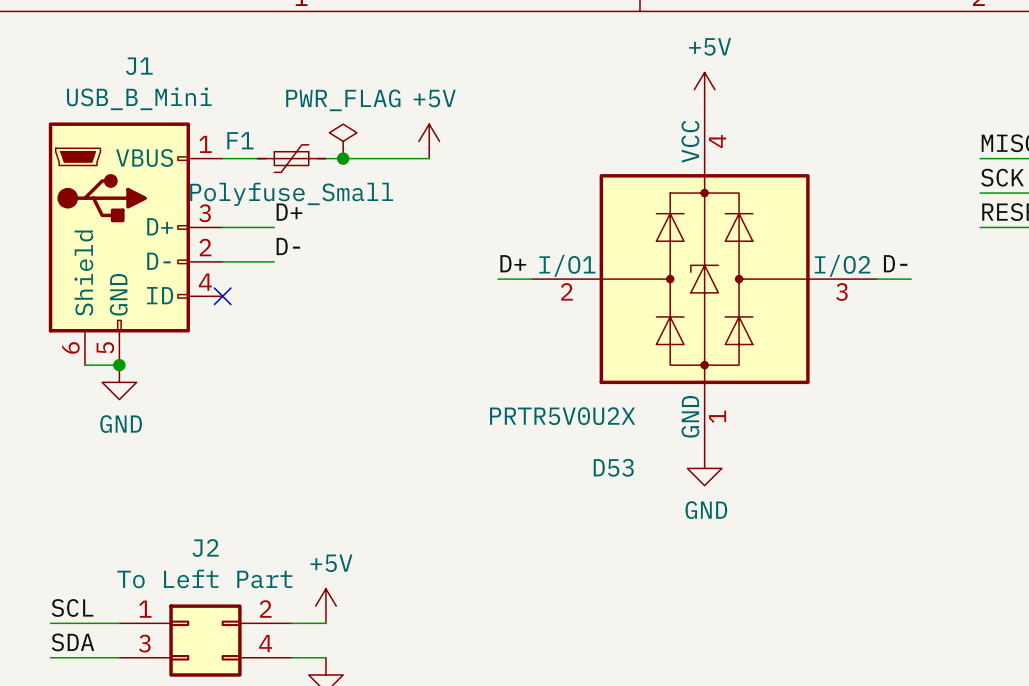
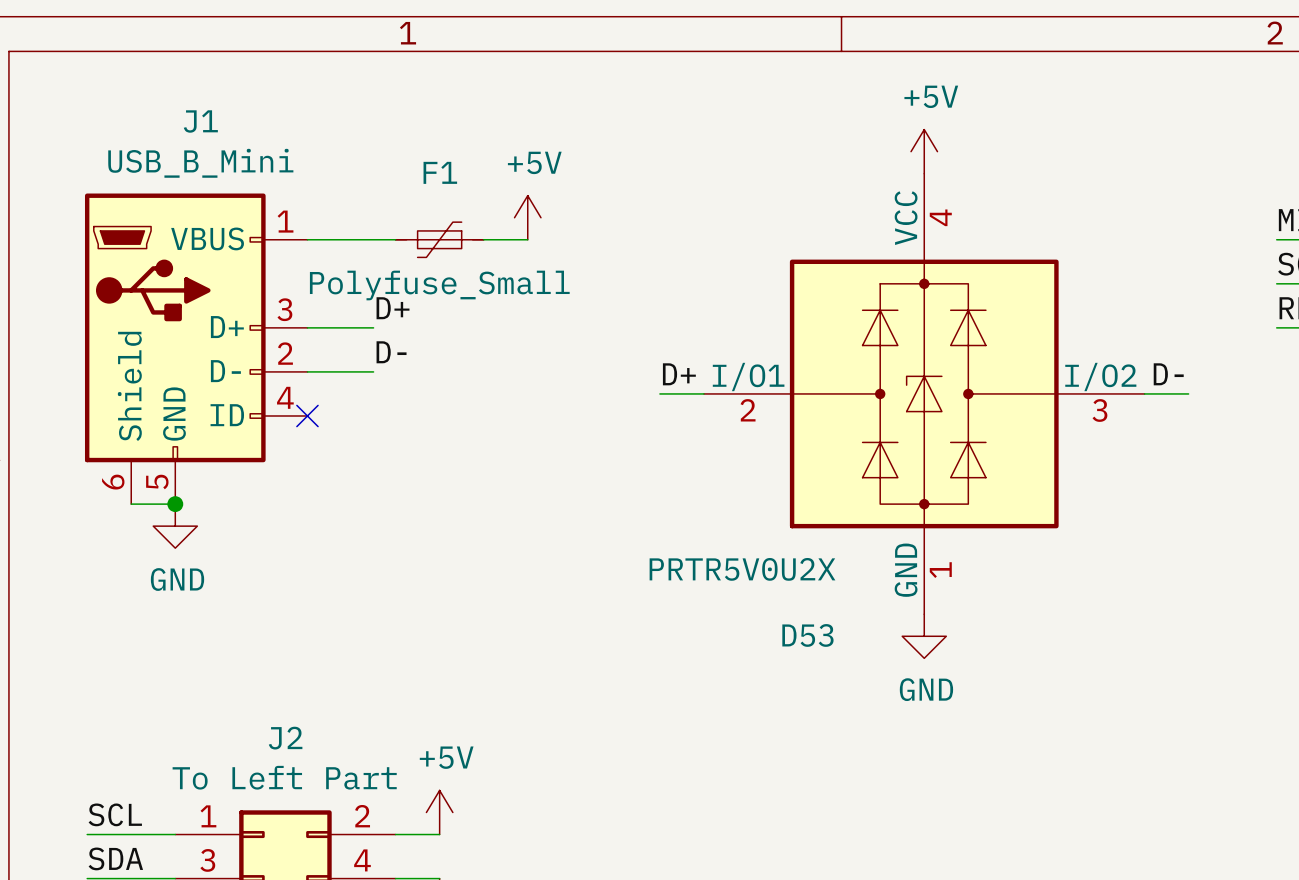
F1 name position: F1 (240, 140) -> F1 (440, 172)
power symbol: PWR_FLAG (343, 141) -> none
power symbol position: +5V (429, 141) -> +5V (527, 217)
F1 position: (291, 158) -> (439, 239)
junction: (343, 158) -> none
wire: (394, 158) (429, 158) -> none

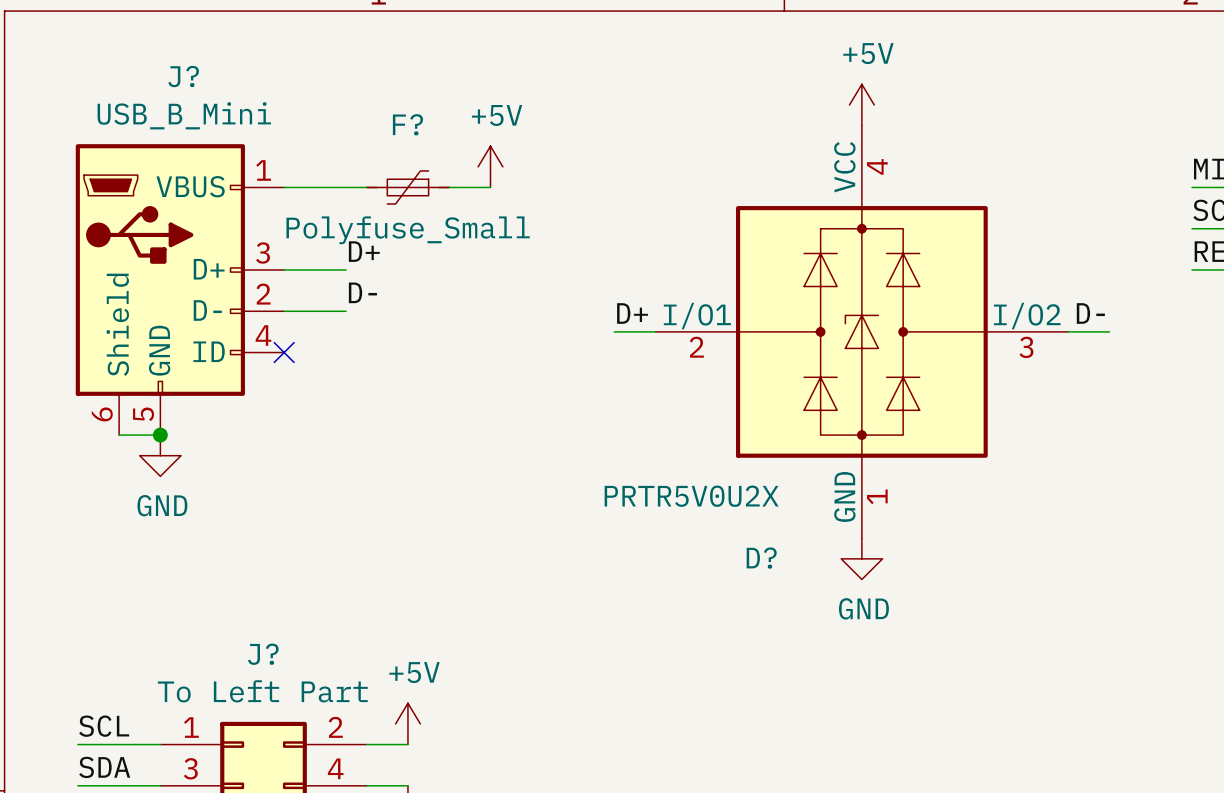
J1 name: J1 (200, 121) -> J? (183, 76)
F1 name: F1 (440, 172) -> F? (407, 124)
D53 name: D53 (807, 635) -> D? (761, 558)
J2 name: J2 (285, 738) -> J? (263, 654)

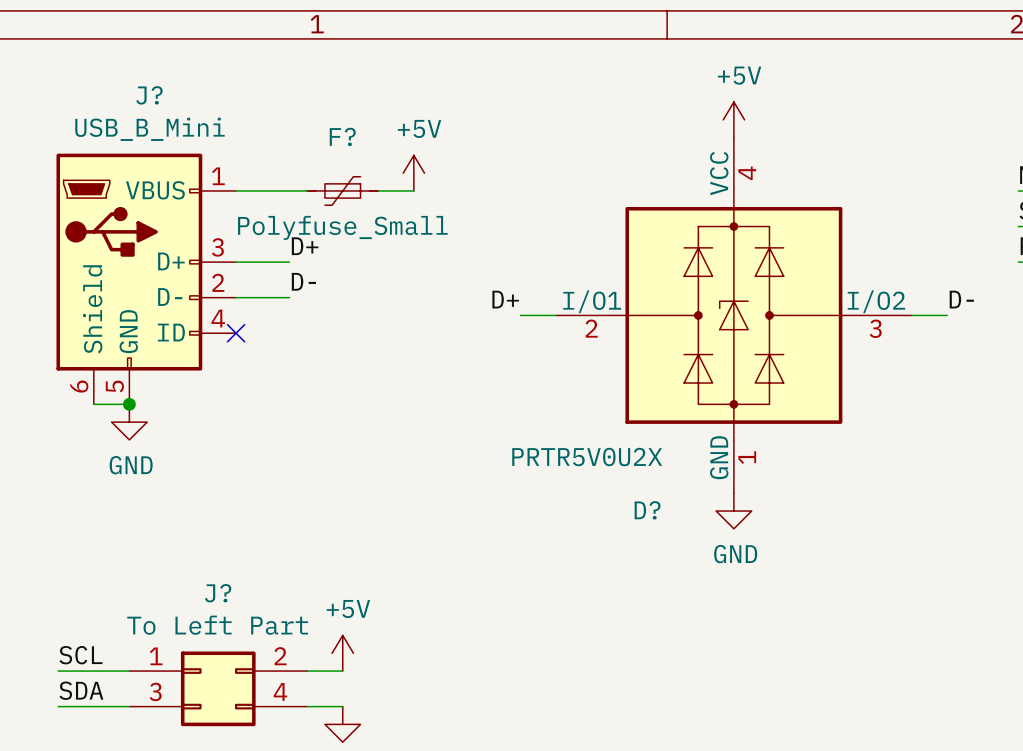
label position: D+ (632, 313) -> D+ (505, 299)
label position: D- (1090, 313) -> D- (961, 299)

